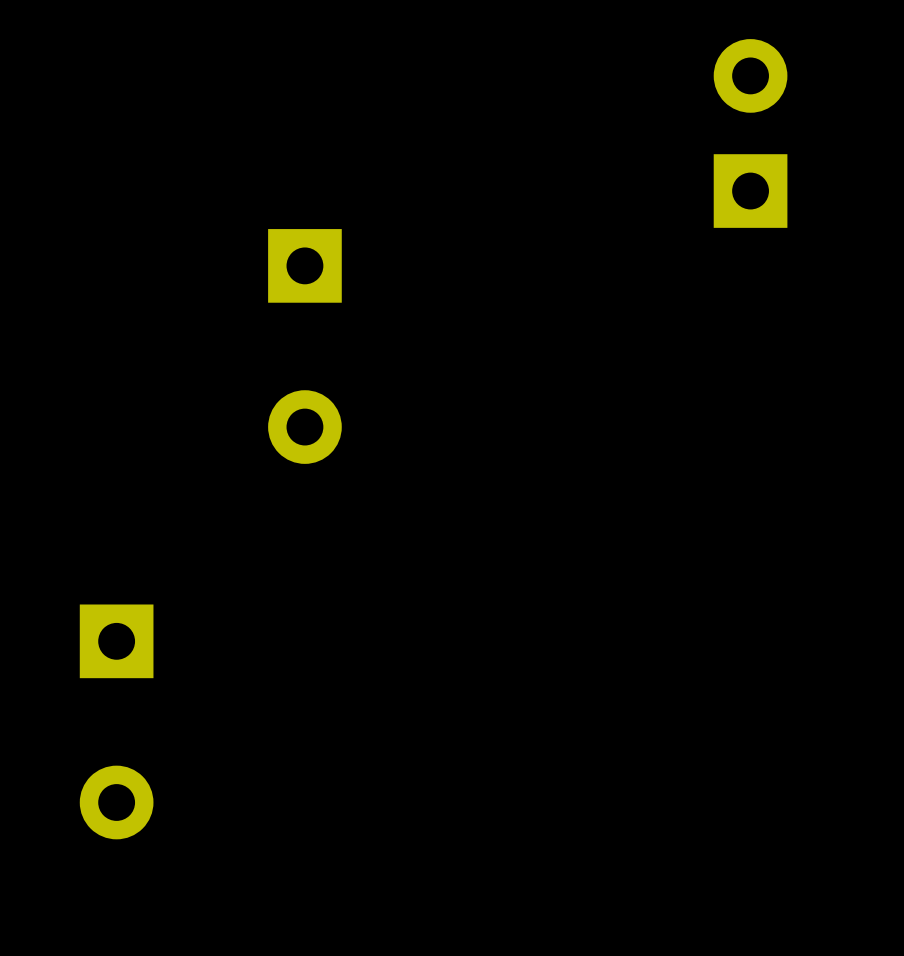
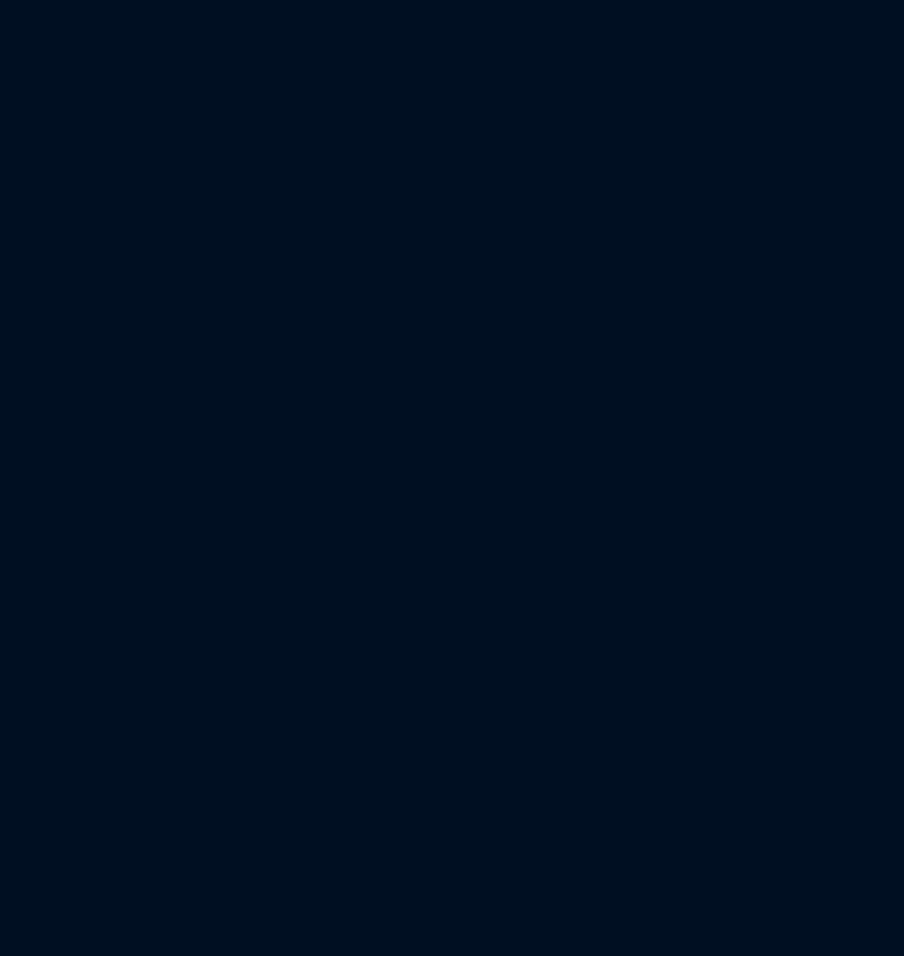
part: (750, 133) -> none
part: (304, 346) -> none
part: (116, 721) -> none

